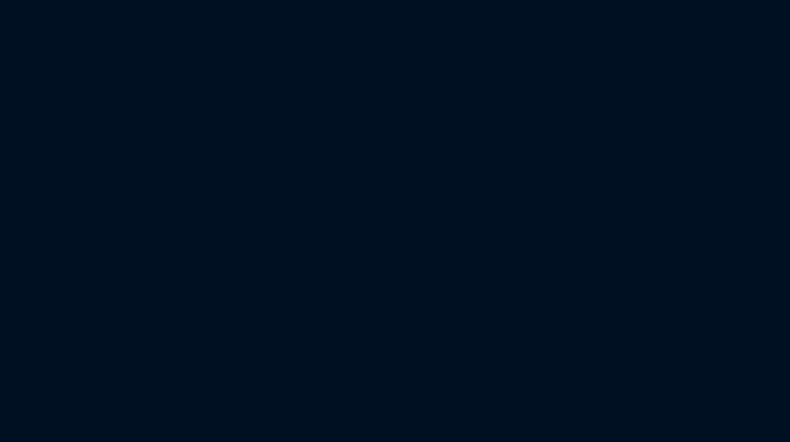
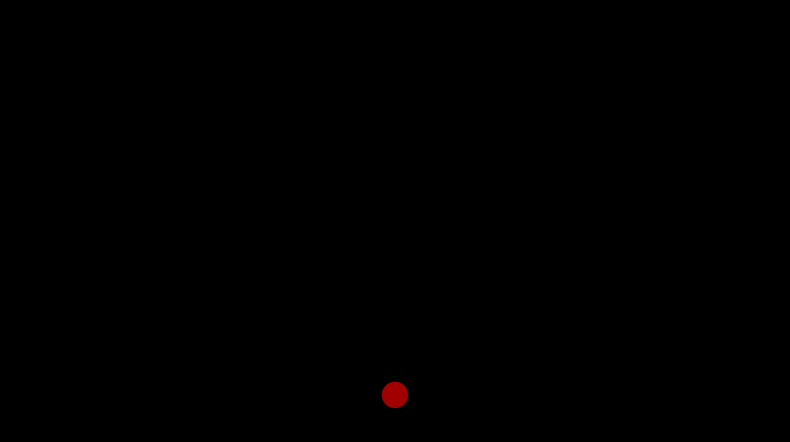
part: none -> (394, 394)

